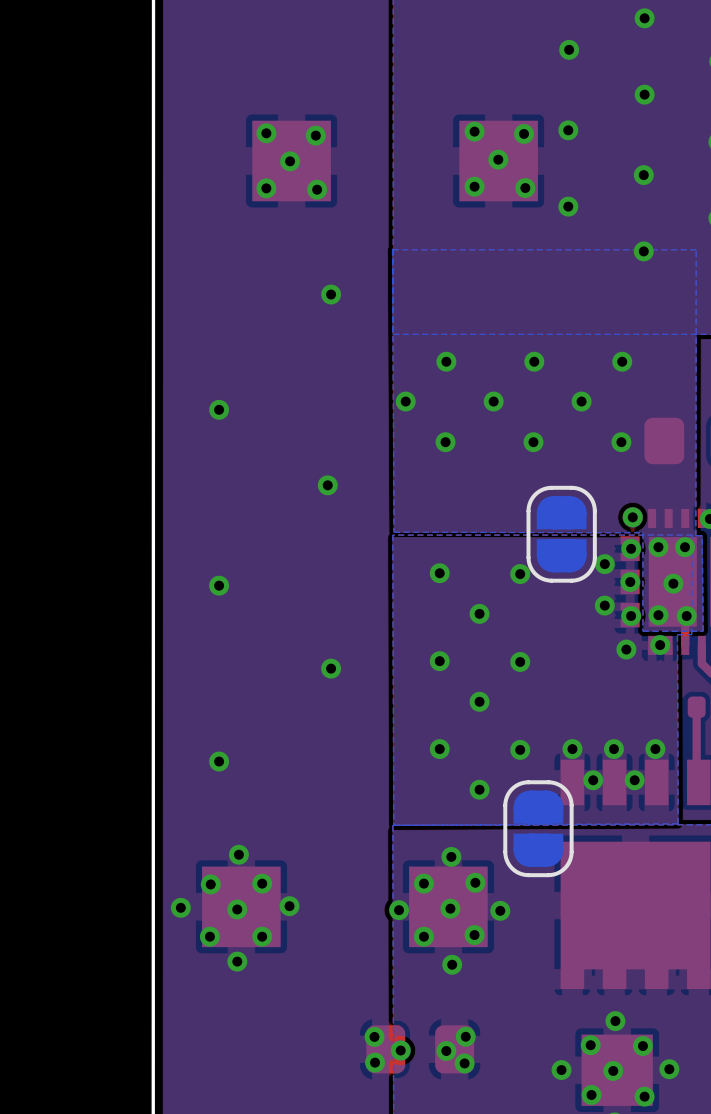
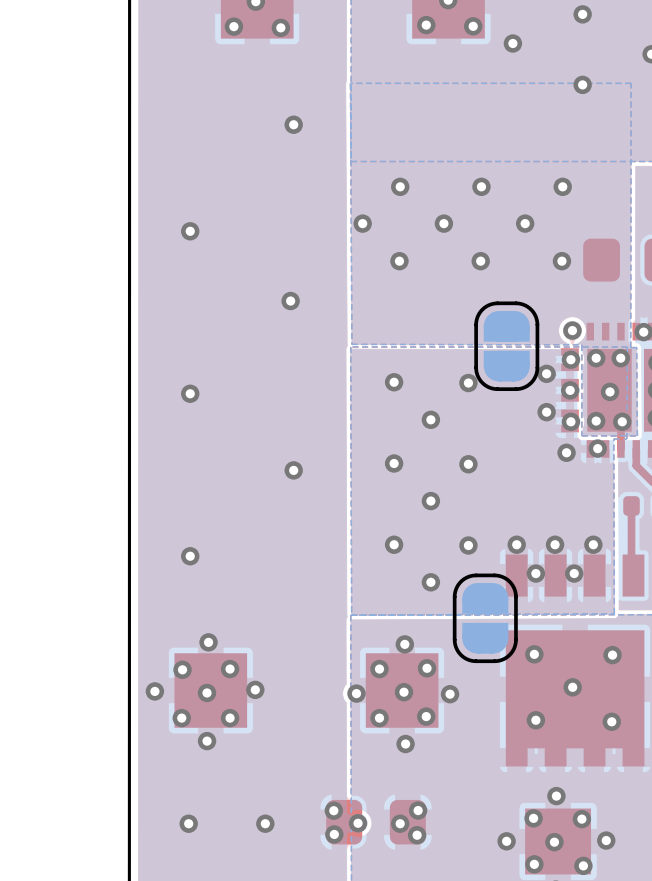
via: none -> (534, 654)
via: none -> (612, 655)
via: none -> (572, 687)
via: none -> (535, 720)
via: none -> (611, 721)
via: none -> (188, 823)
via: none -> (265, 823)

